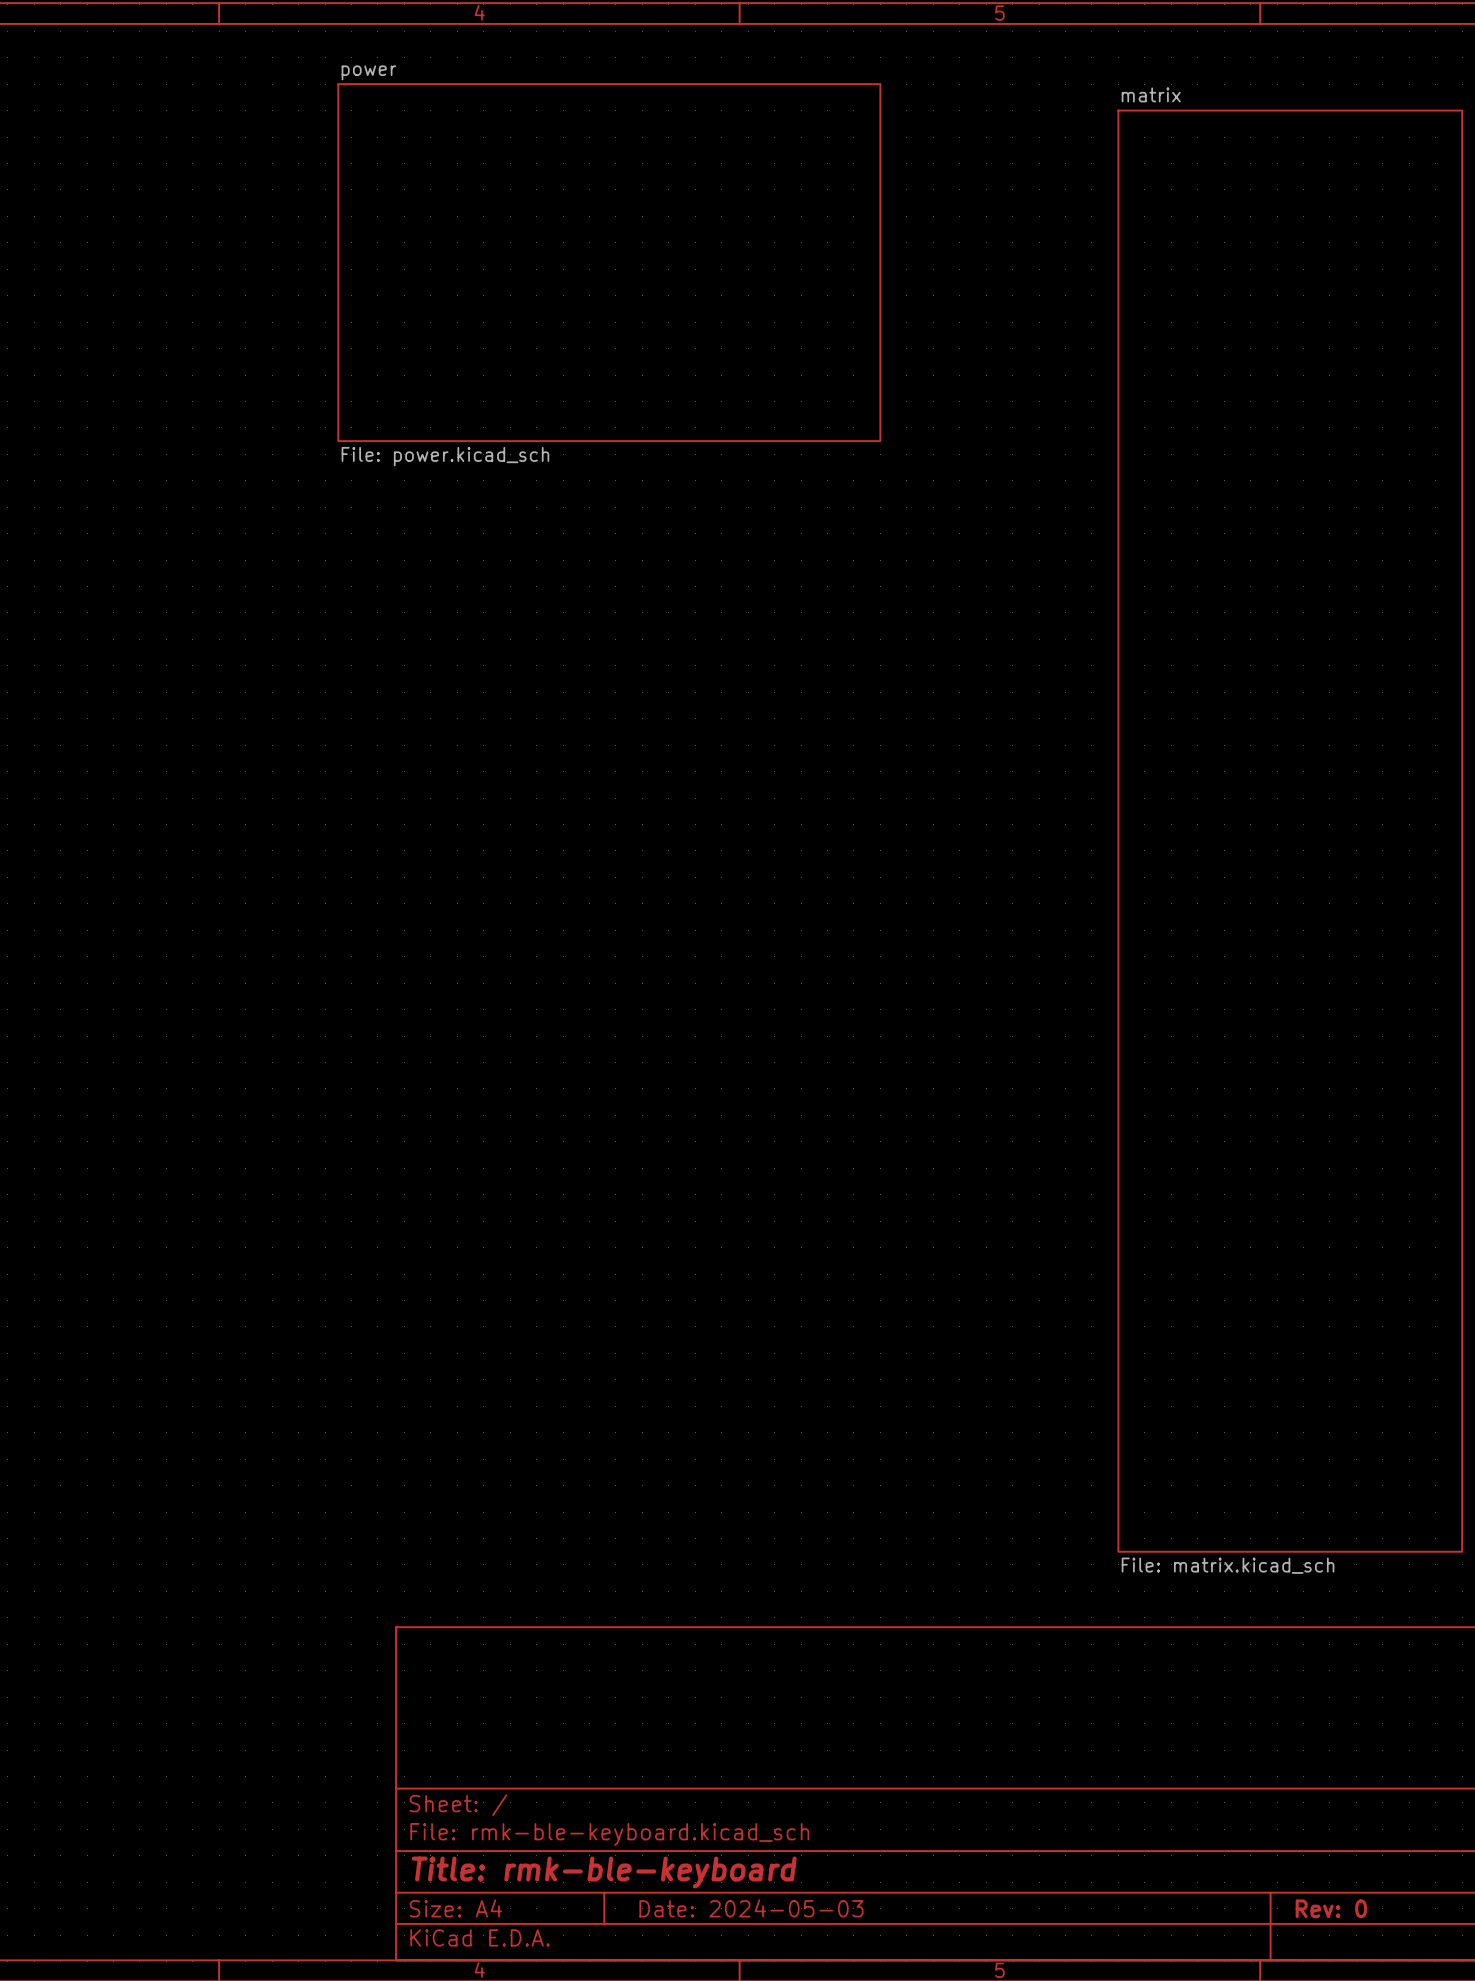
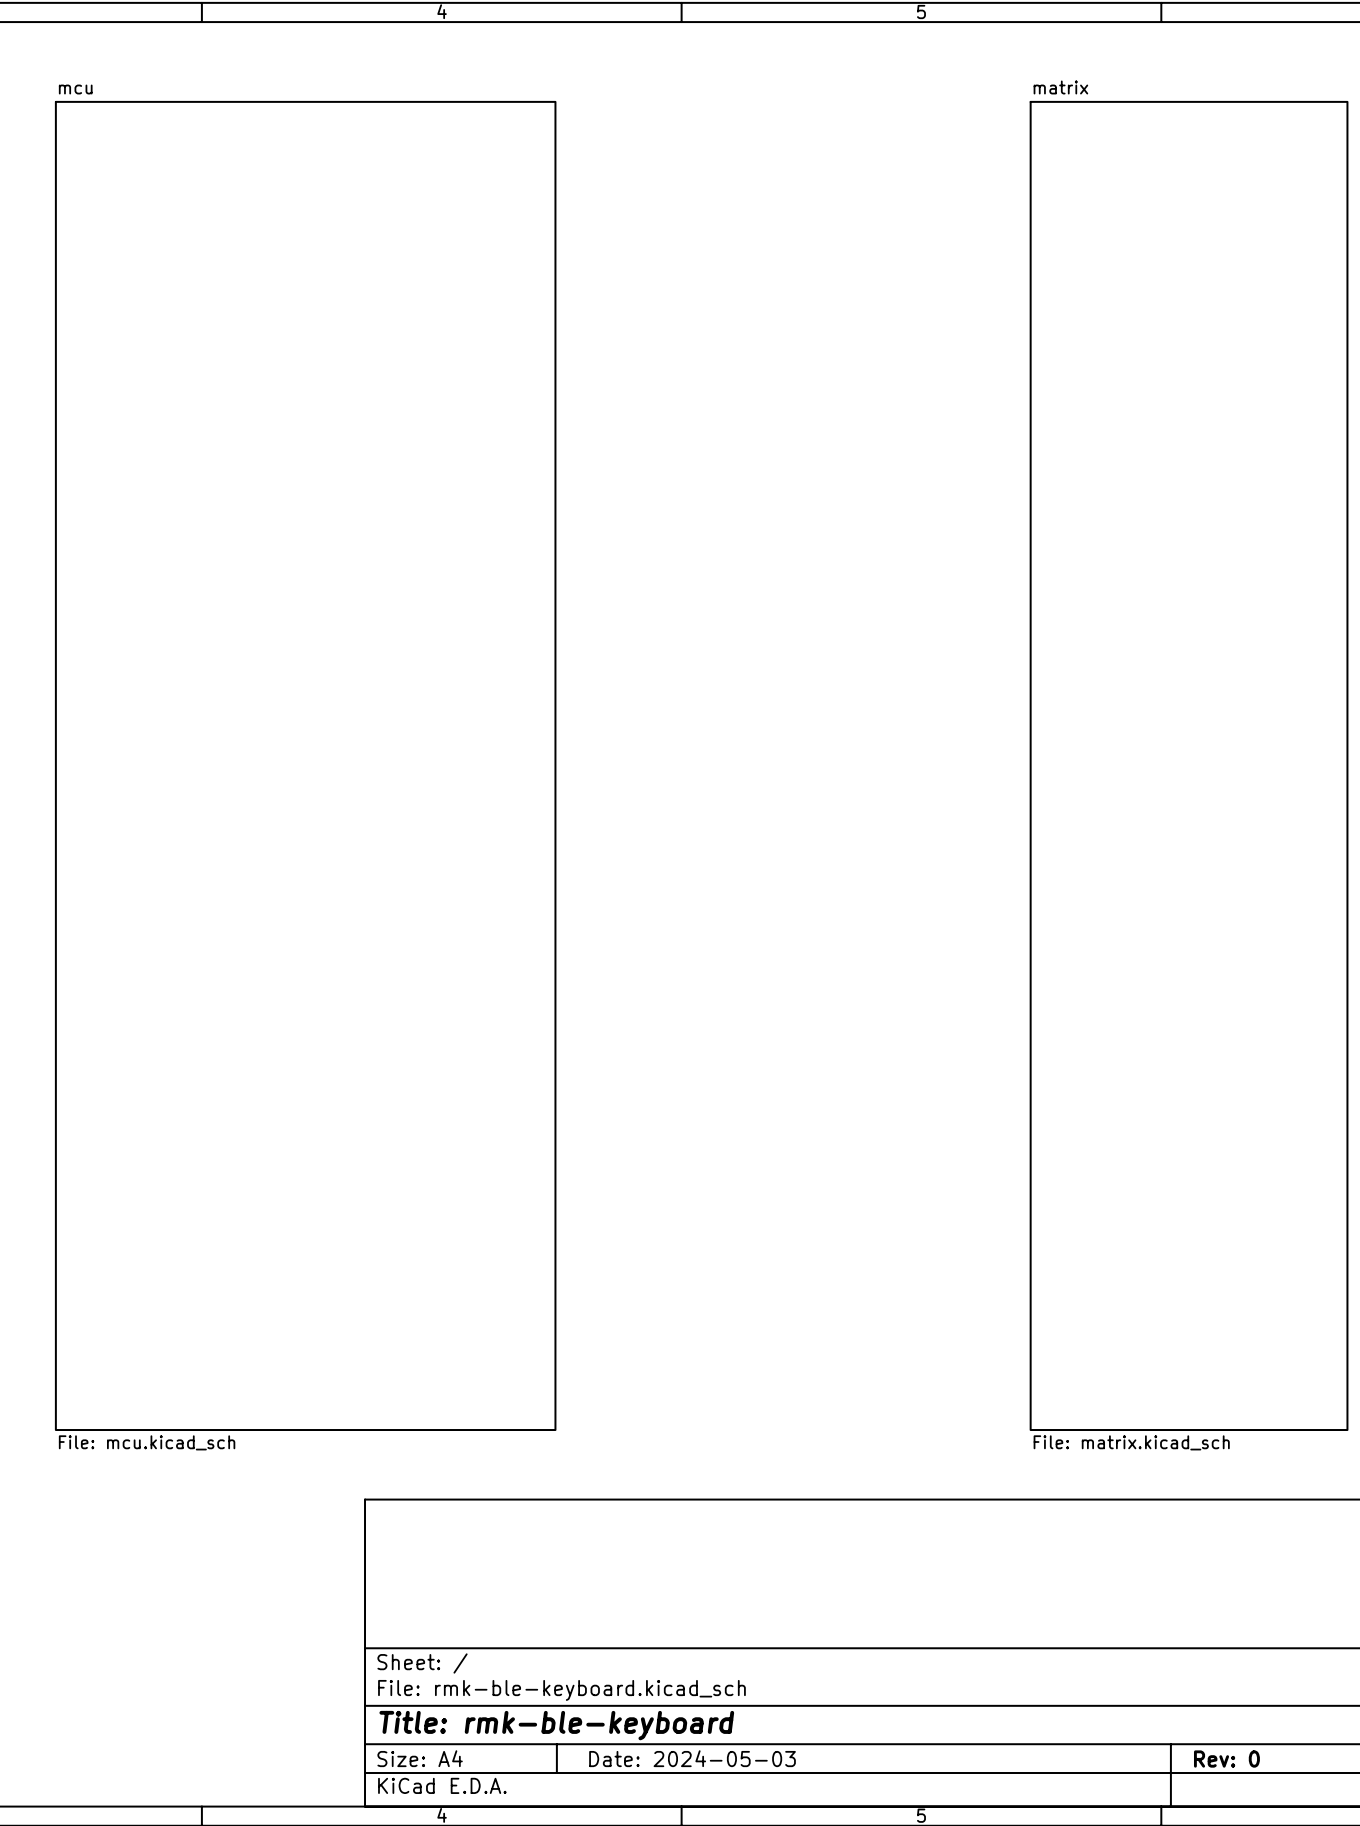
sheet power: File: power.kicad_sch (609, 262) -> none
sheet mcu: none -> File: mcu.kicad_sch (305, 765)

